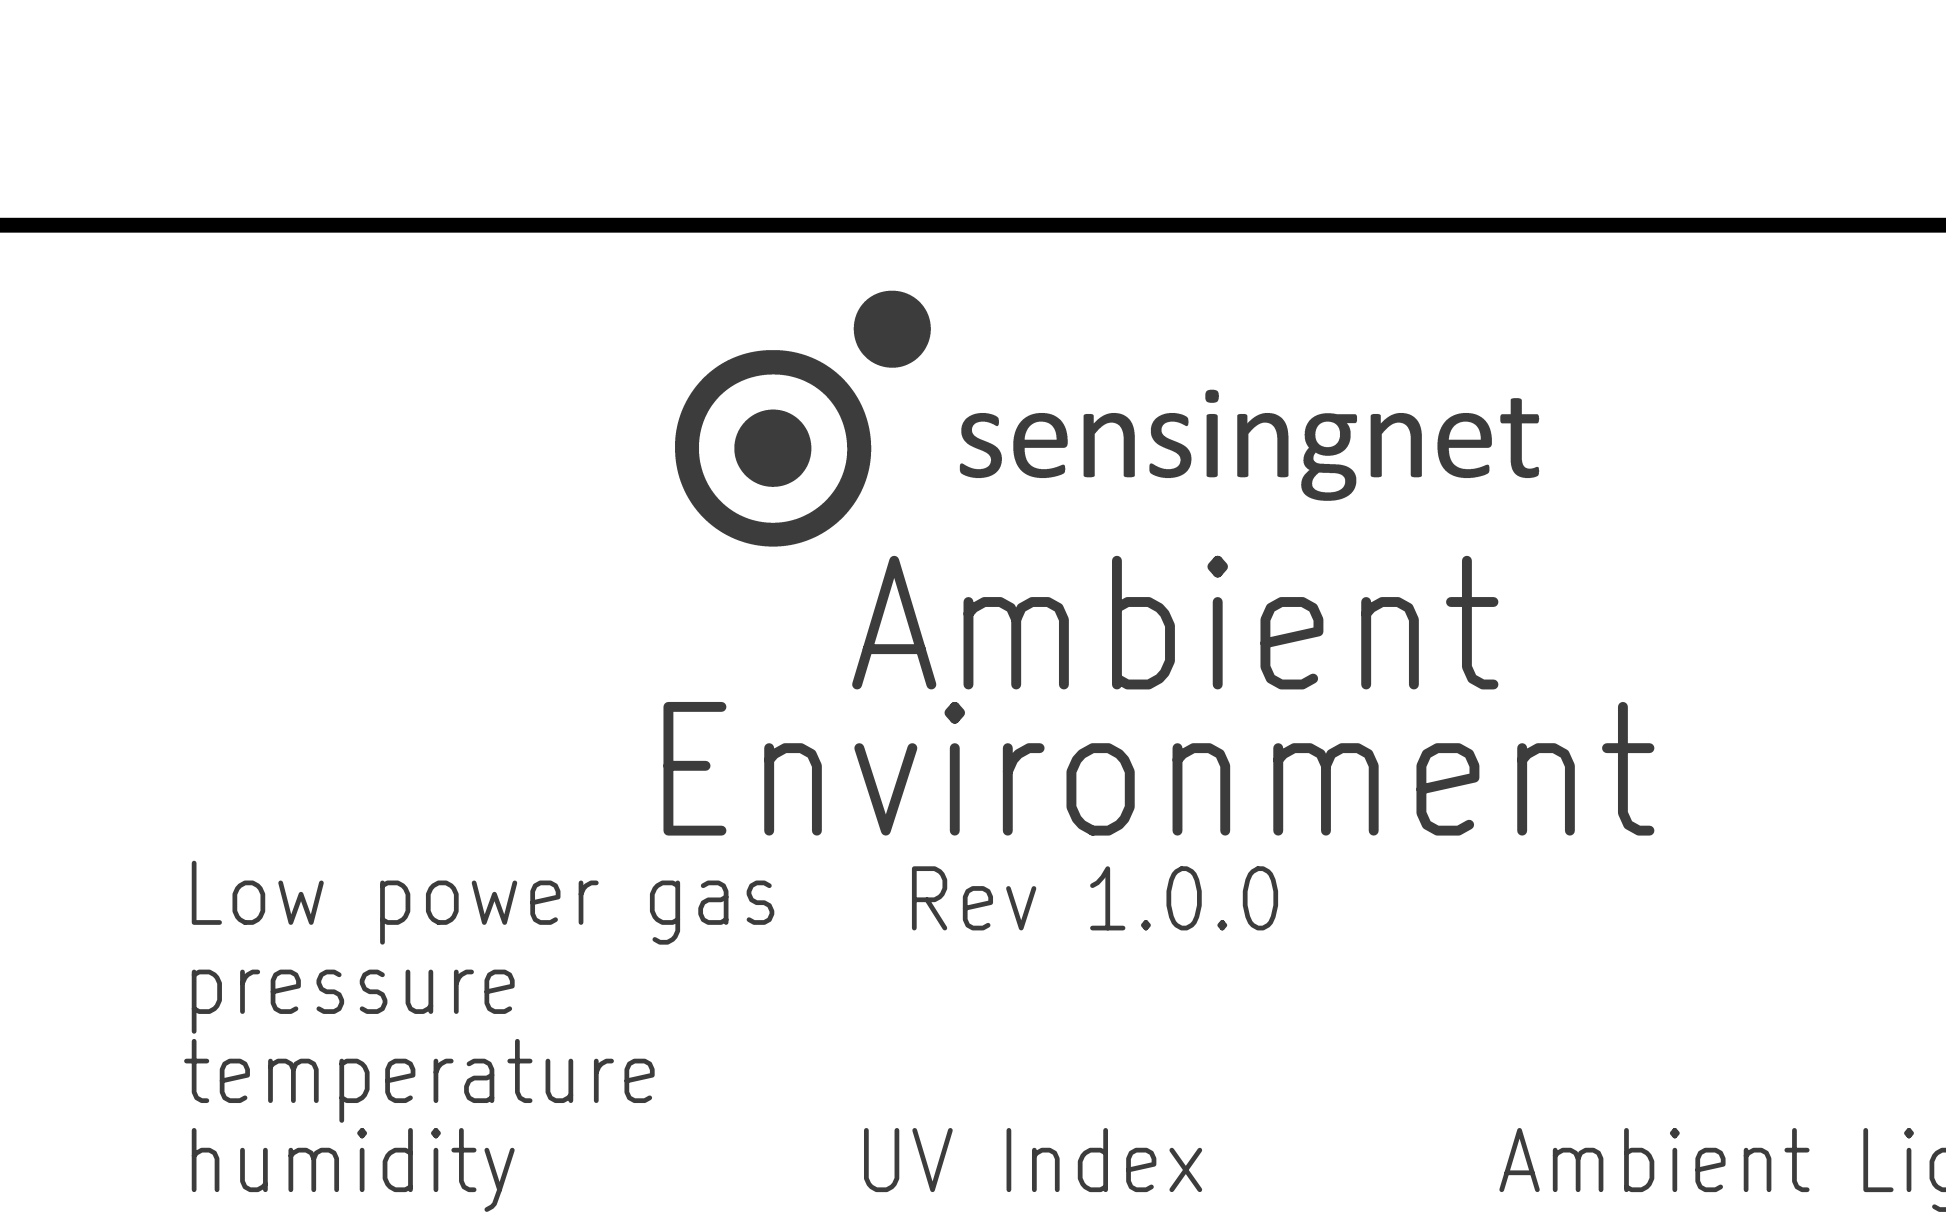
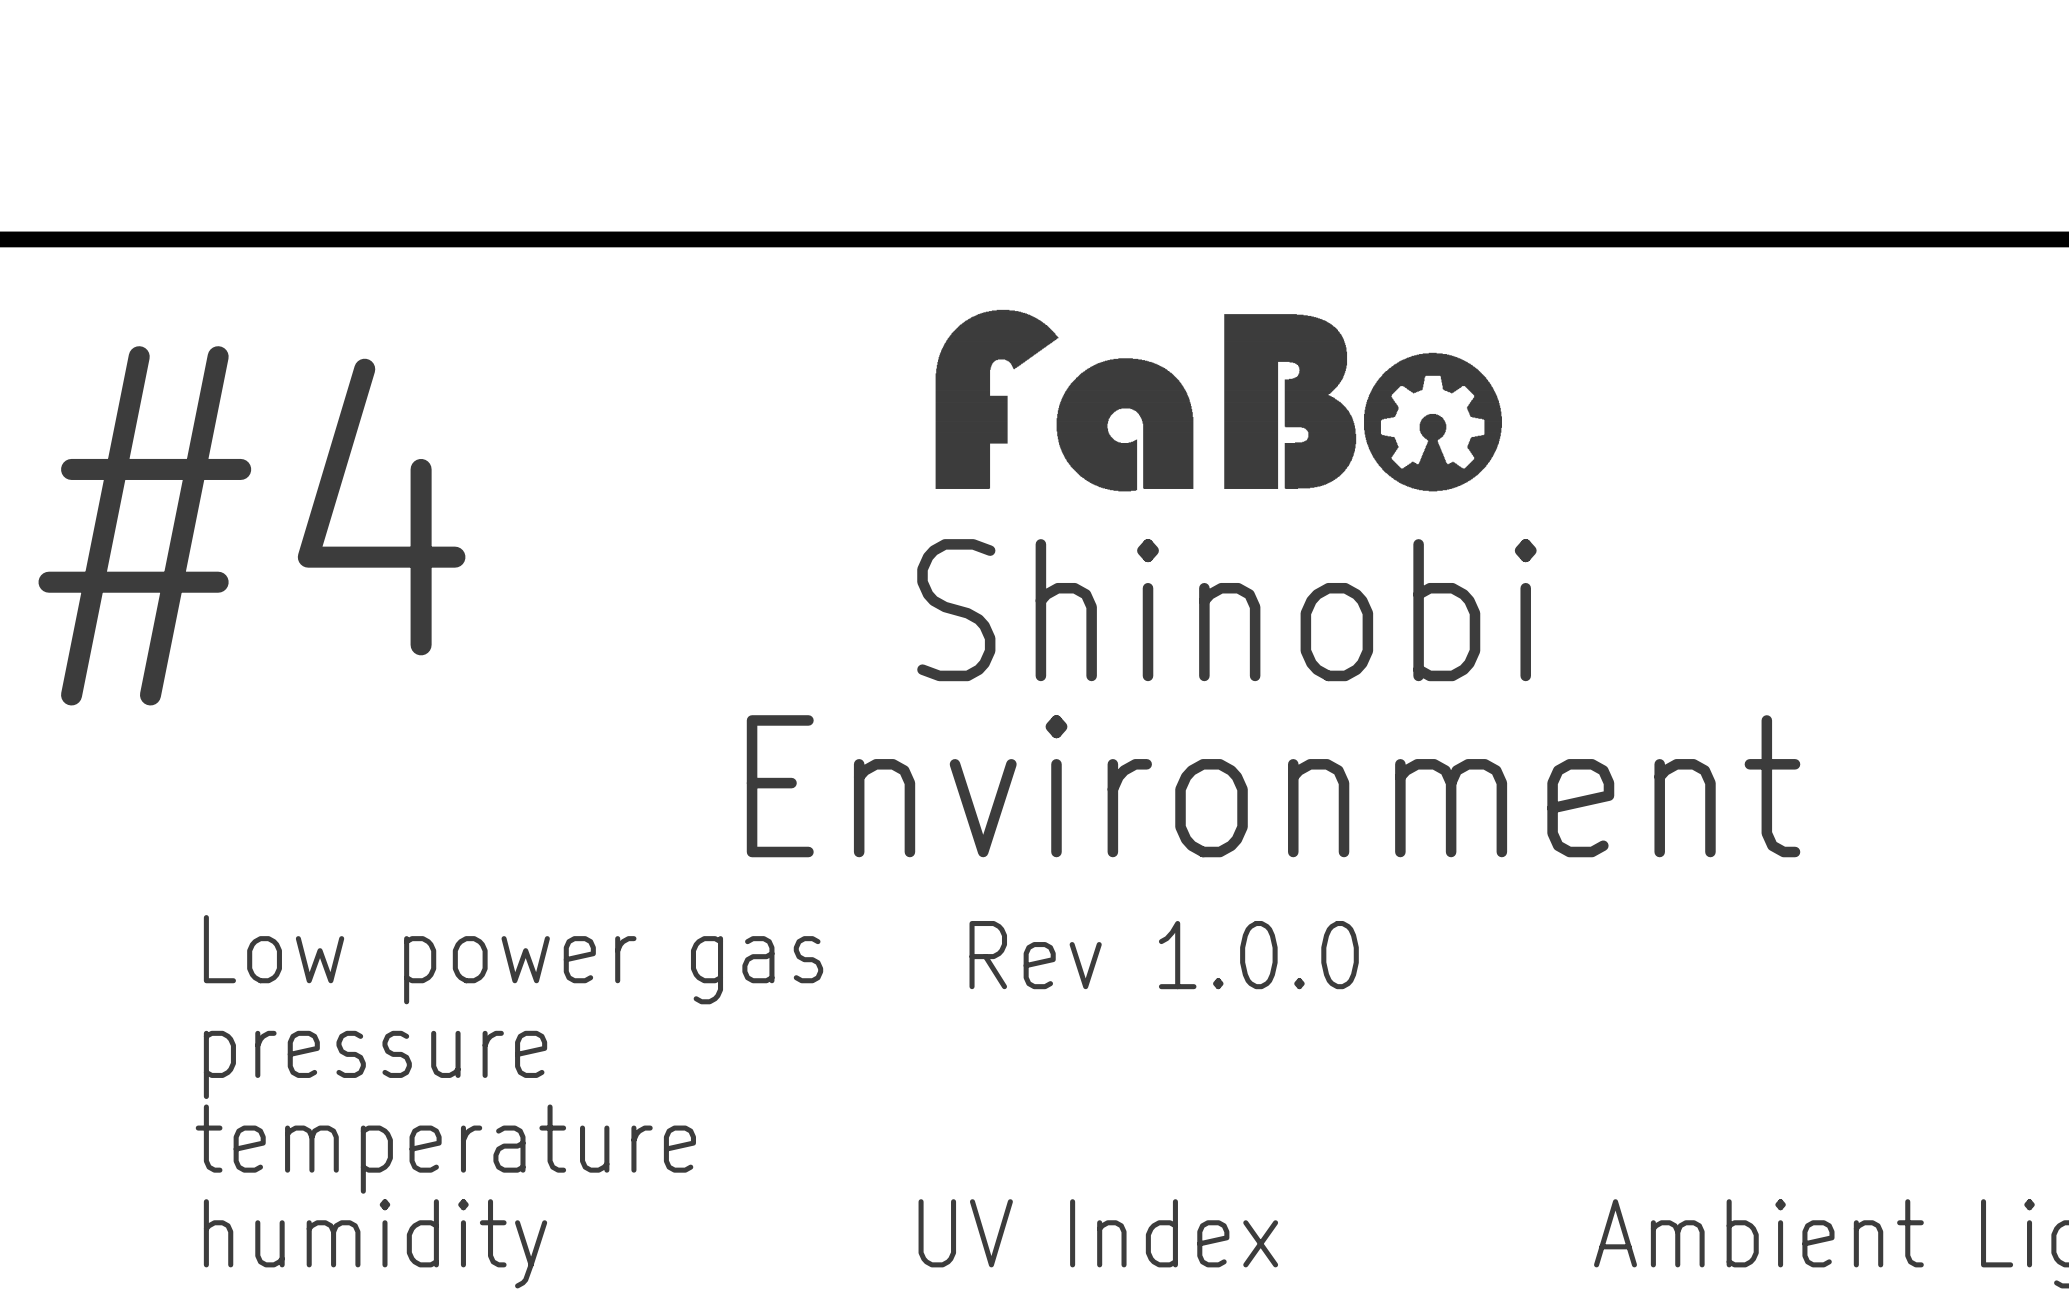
drawing shape: [675, 290, 1540, 547] -> [935, 309, 1502, 492]
text: none -> #4 (251, 525)
text: Ambient (1175, 622) -> Shinobi (1226, 610)
text position: Environment (1158, 768) -> Environment (1273, 786)

